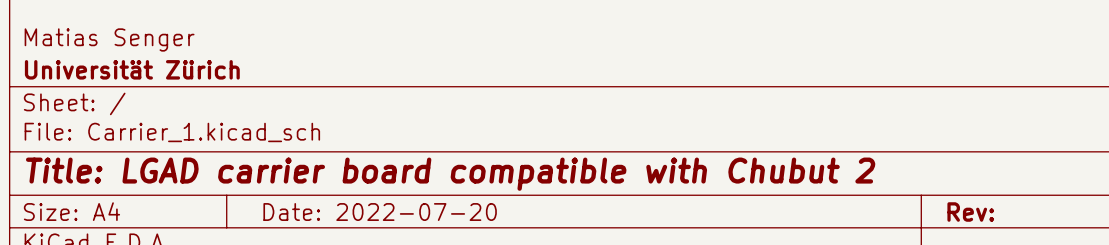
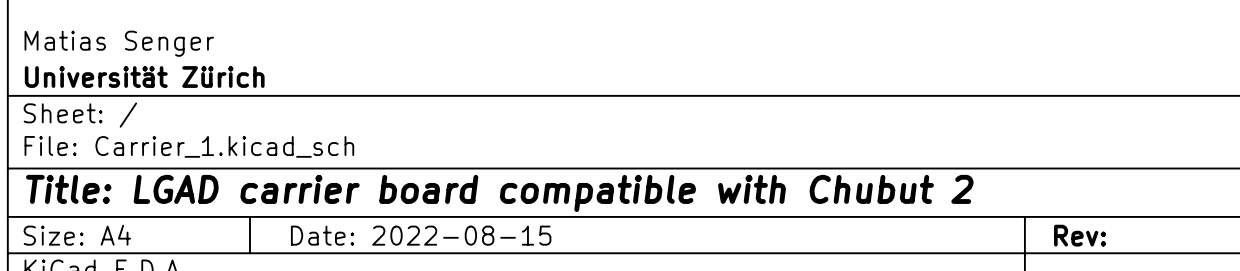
title block: Date: 2022-07-20 (380, 212) -> Date: 2022-08-15 (421, 235)

